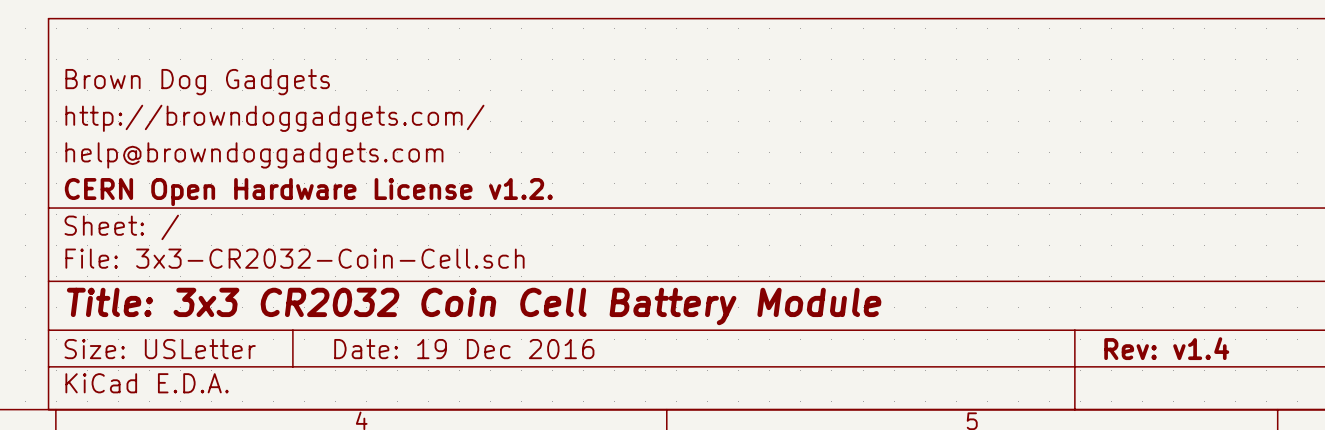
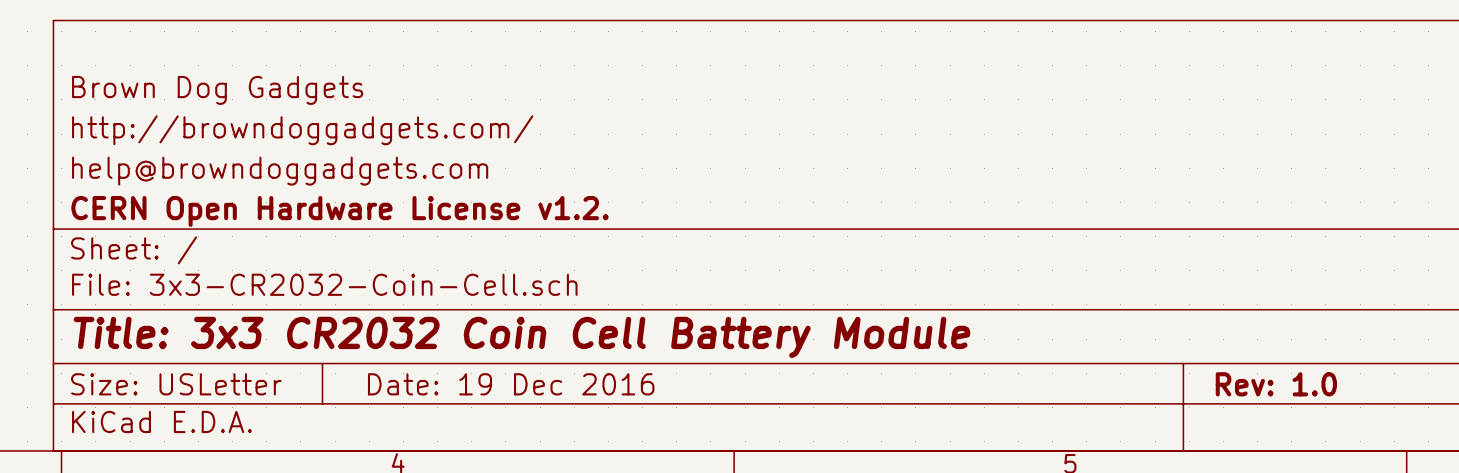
title block: Rev: v1.4 (1166, 348) -> Rev: 1.0 (1276, 384)

